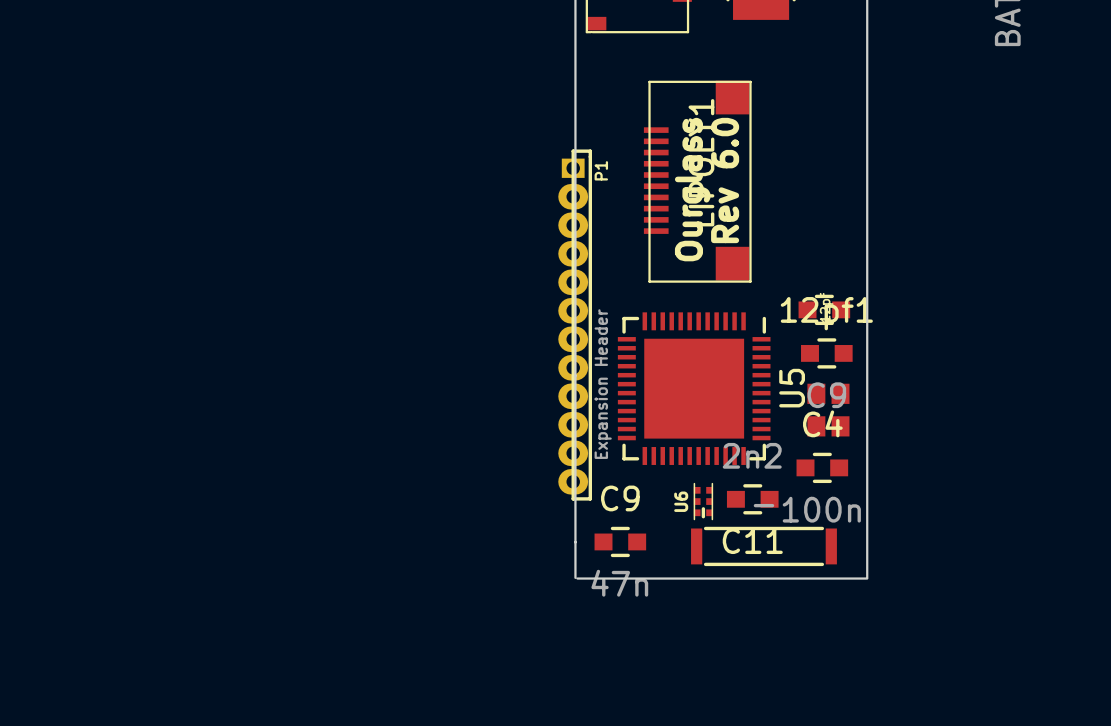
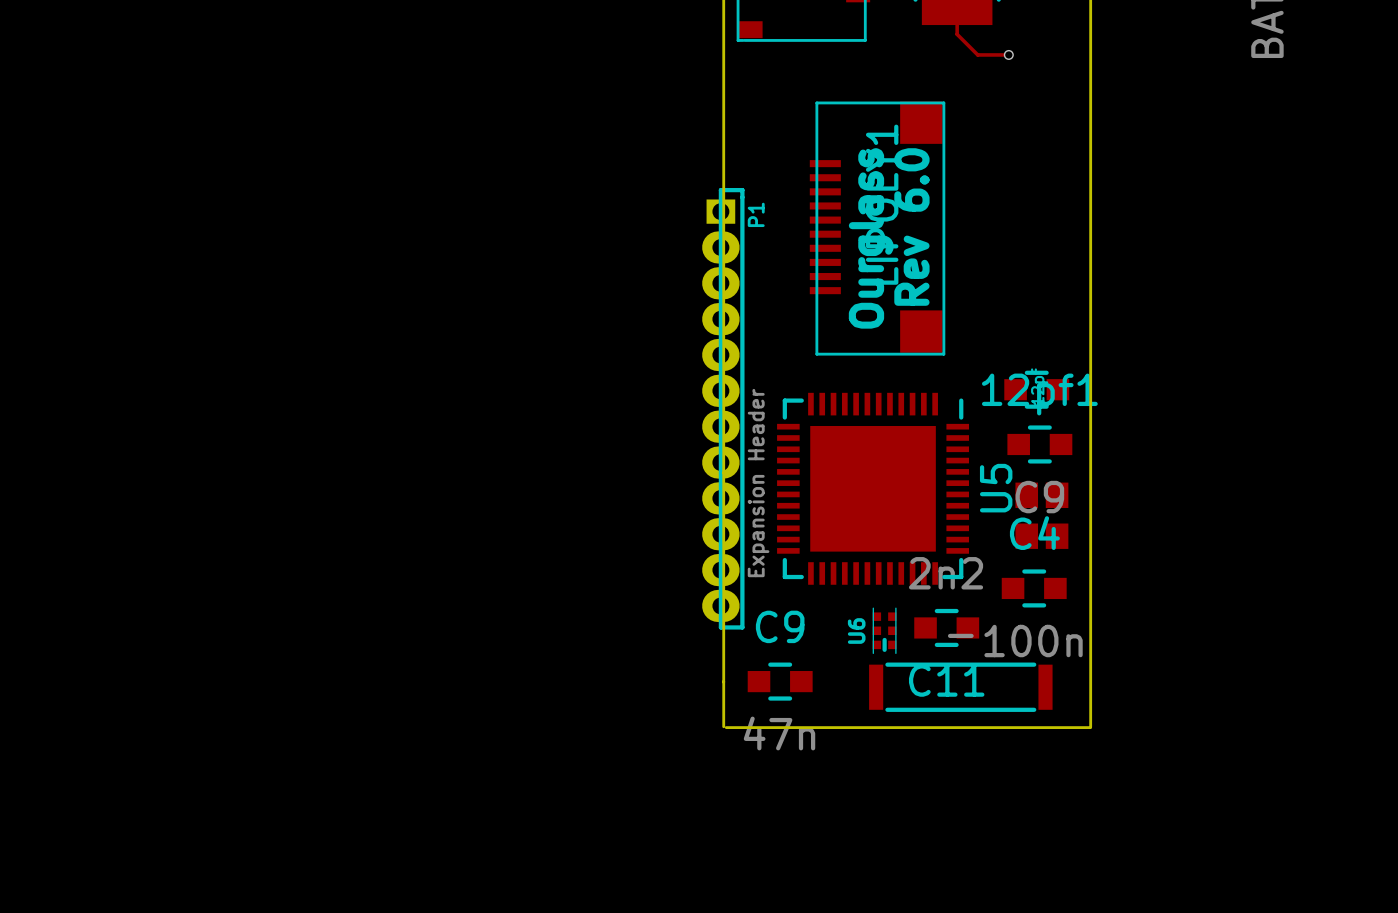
track: none -> (957, 12) (957, 34) (977, 54) (1008, 54)
via: none -> (1008, 54)

